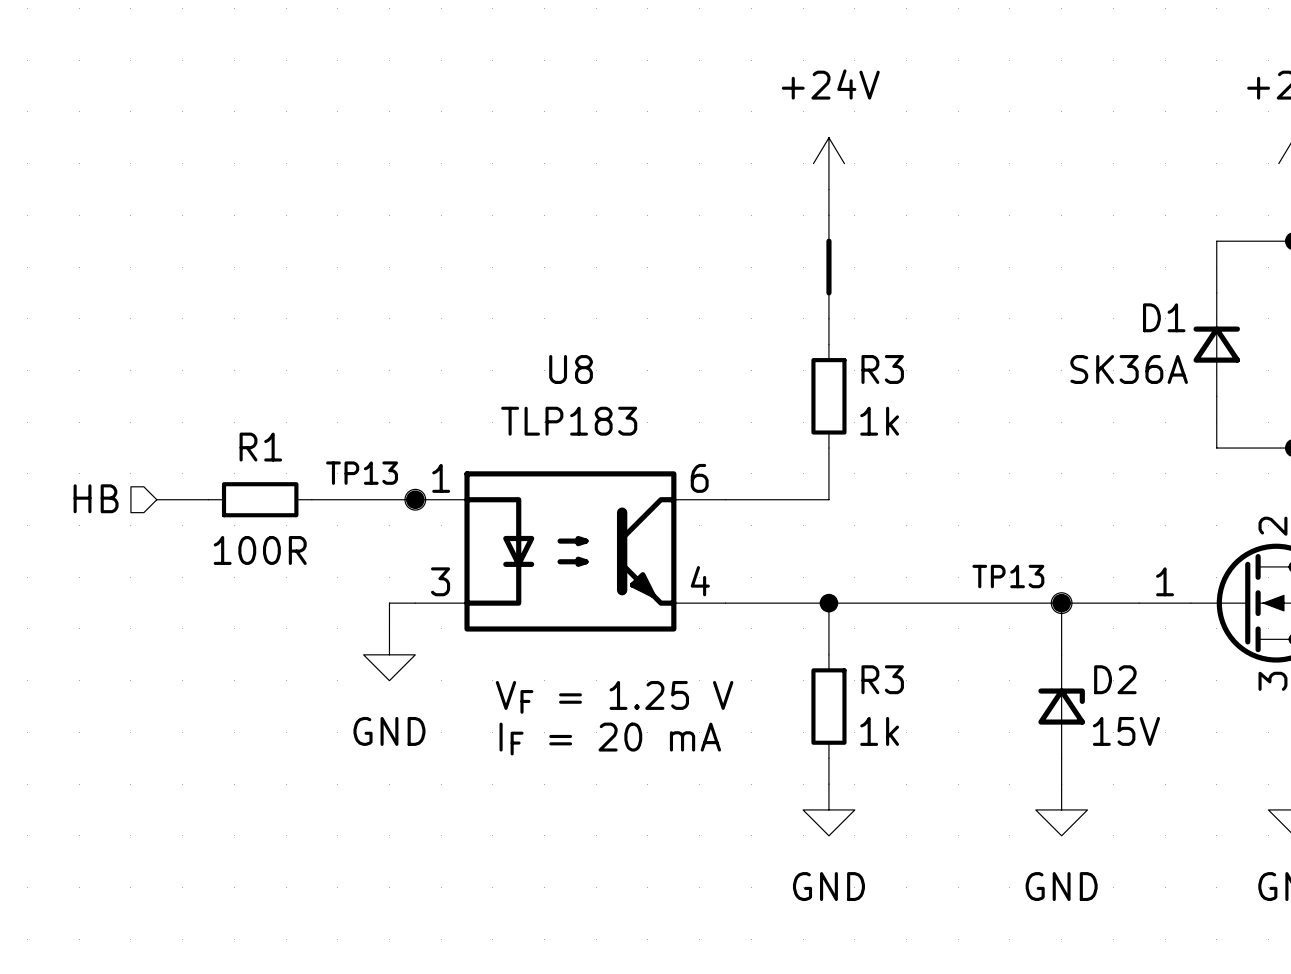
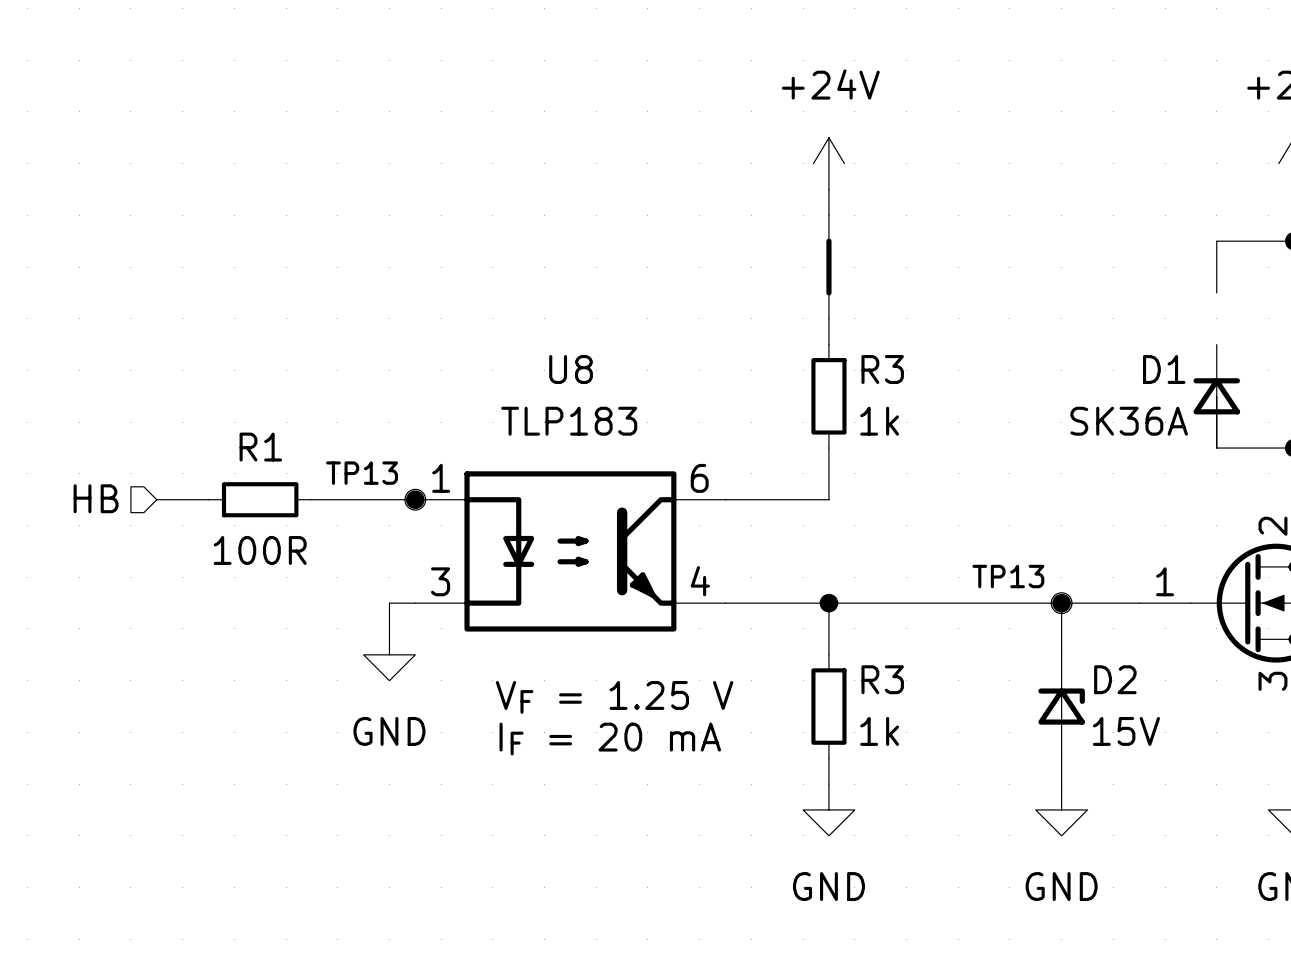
D1 position: (1216, 344) -> (1216, 396)

